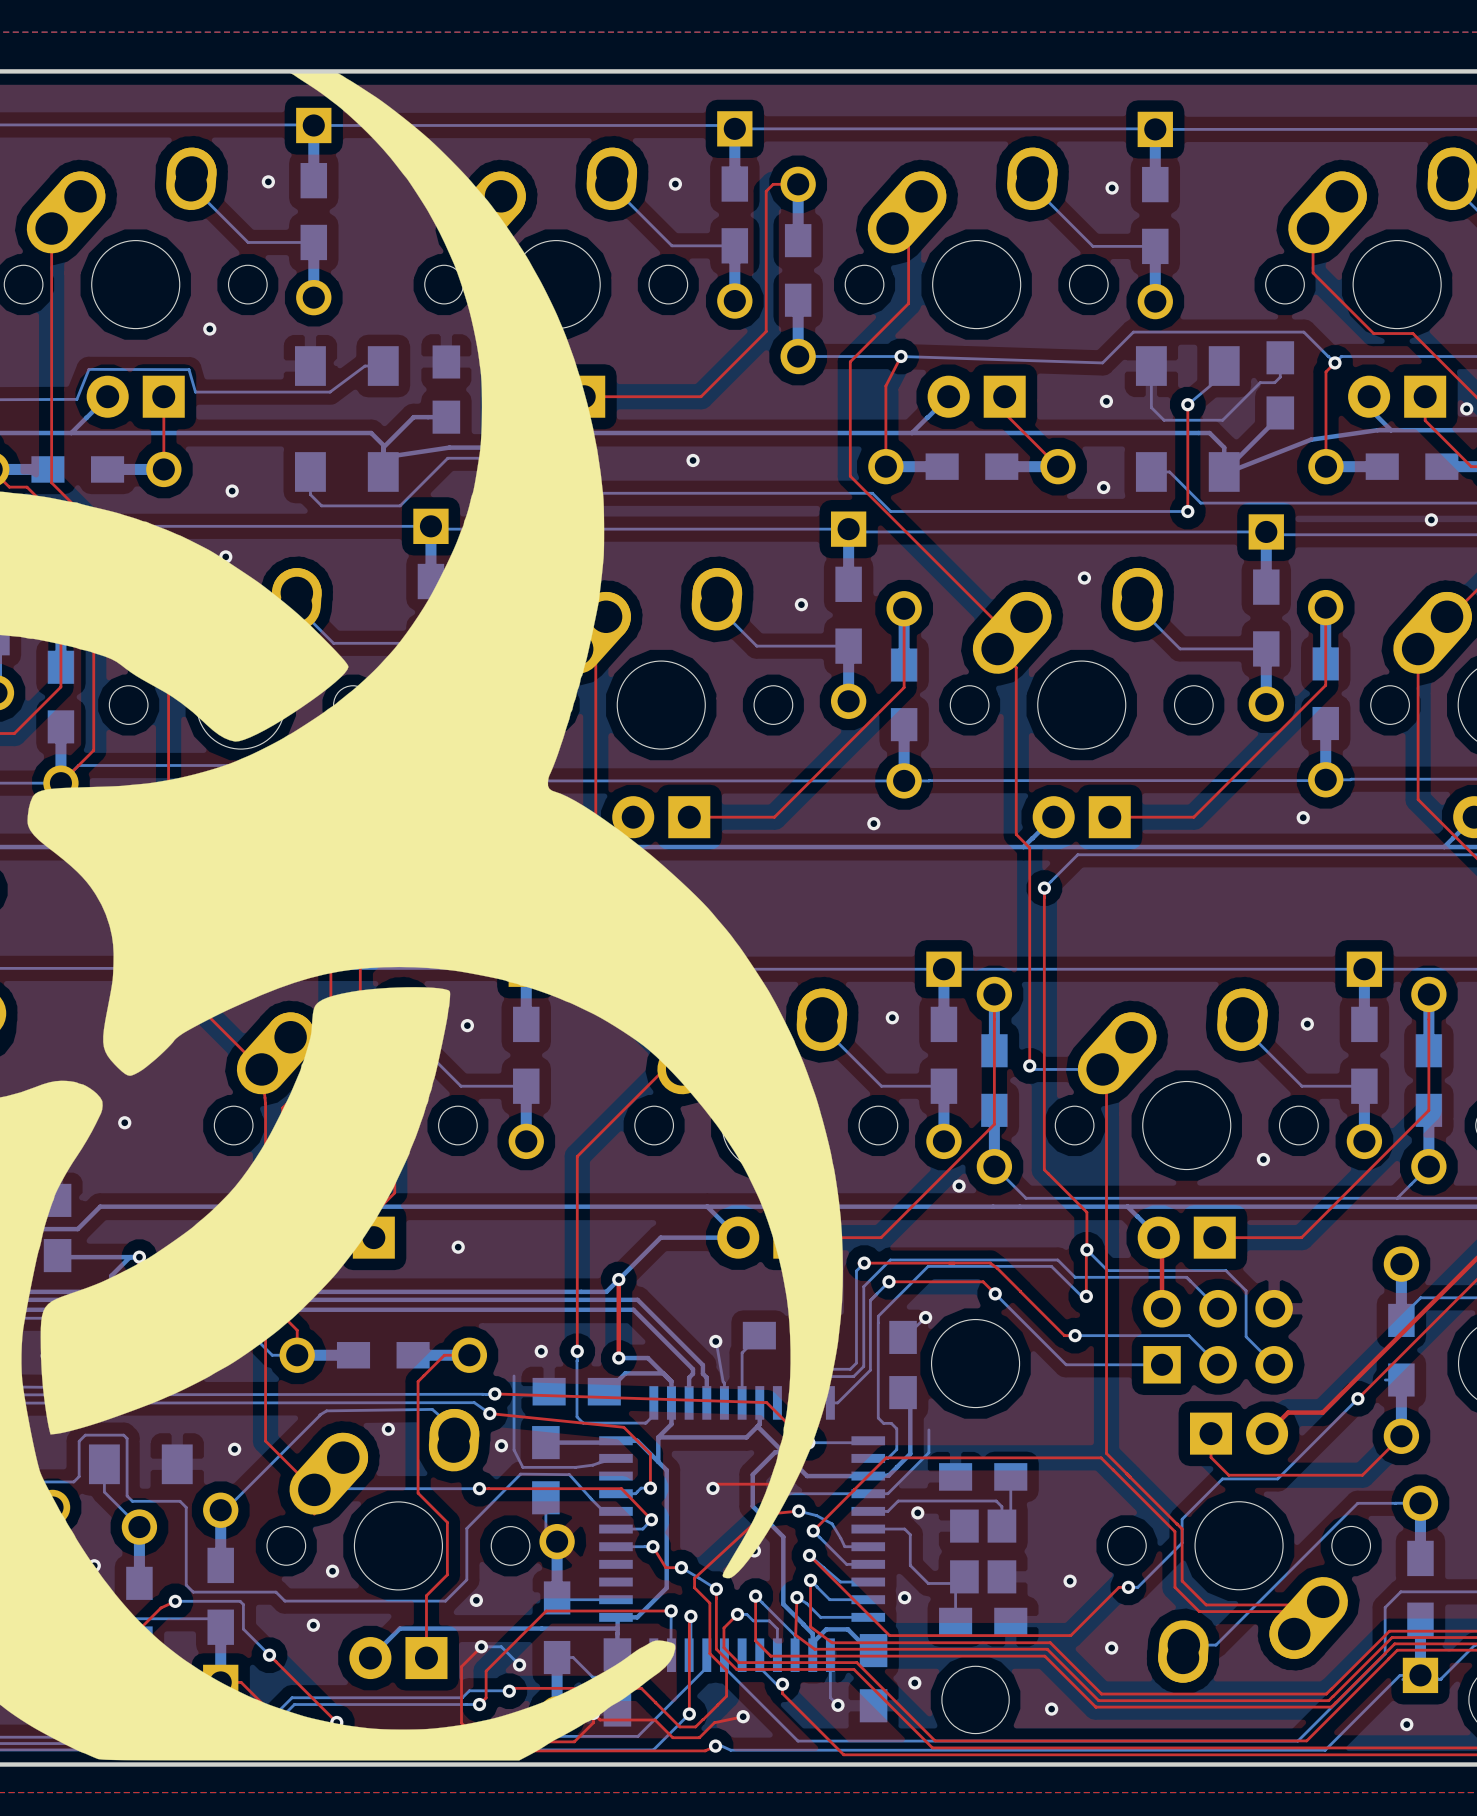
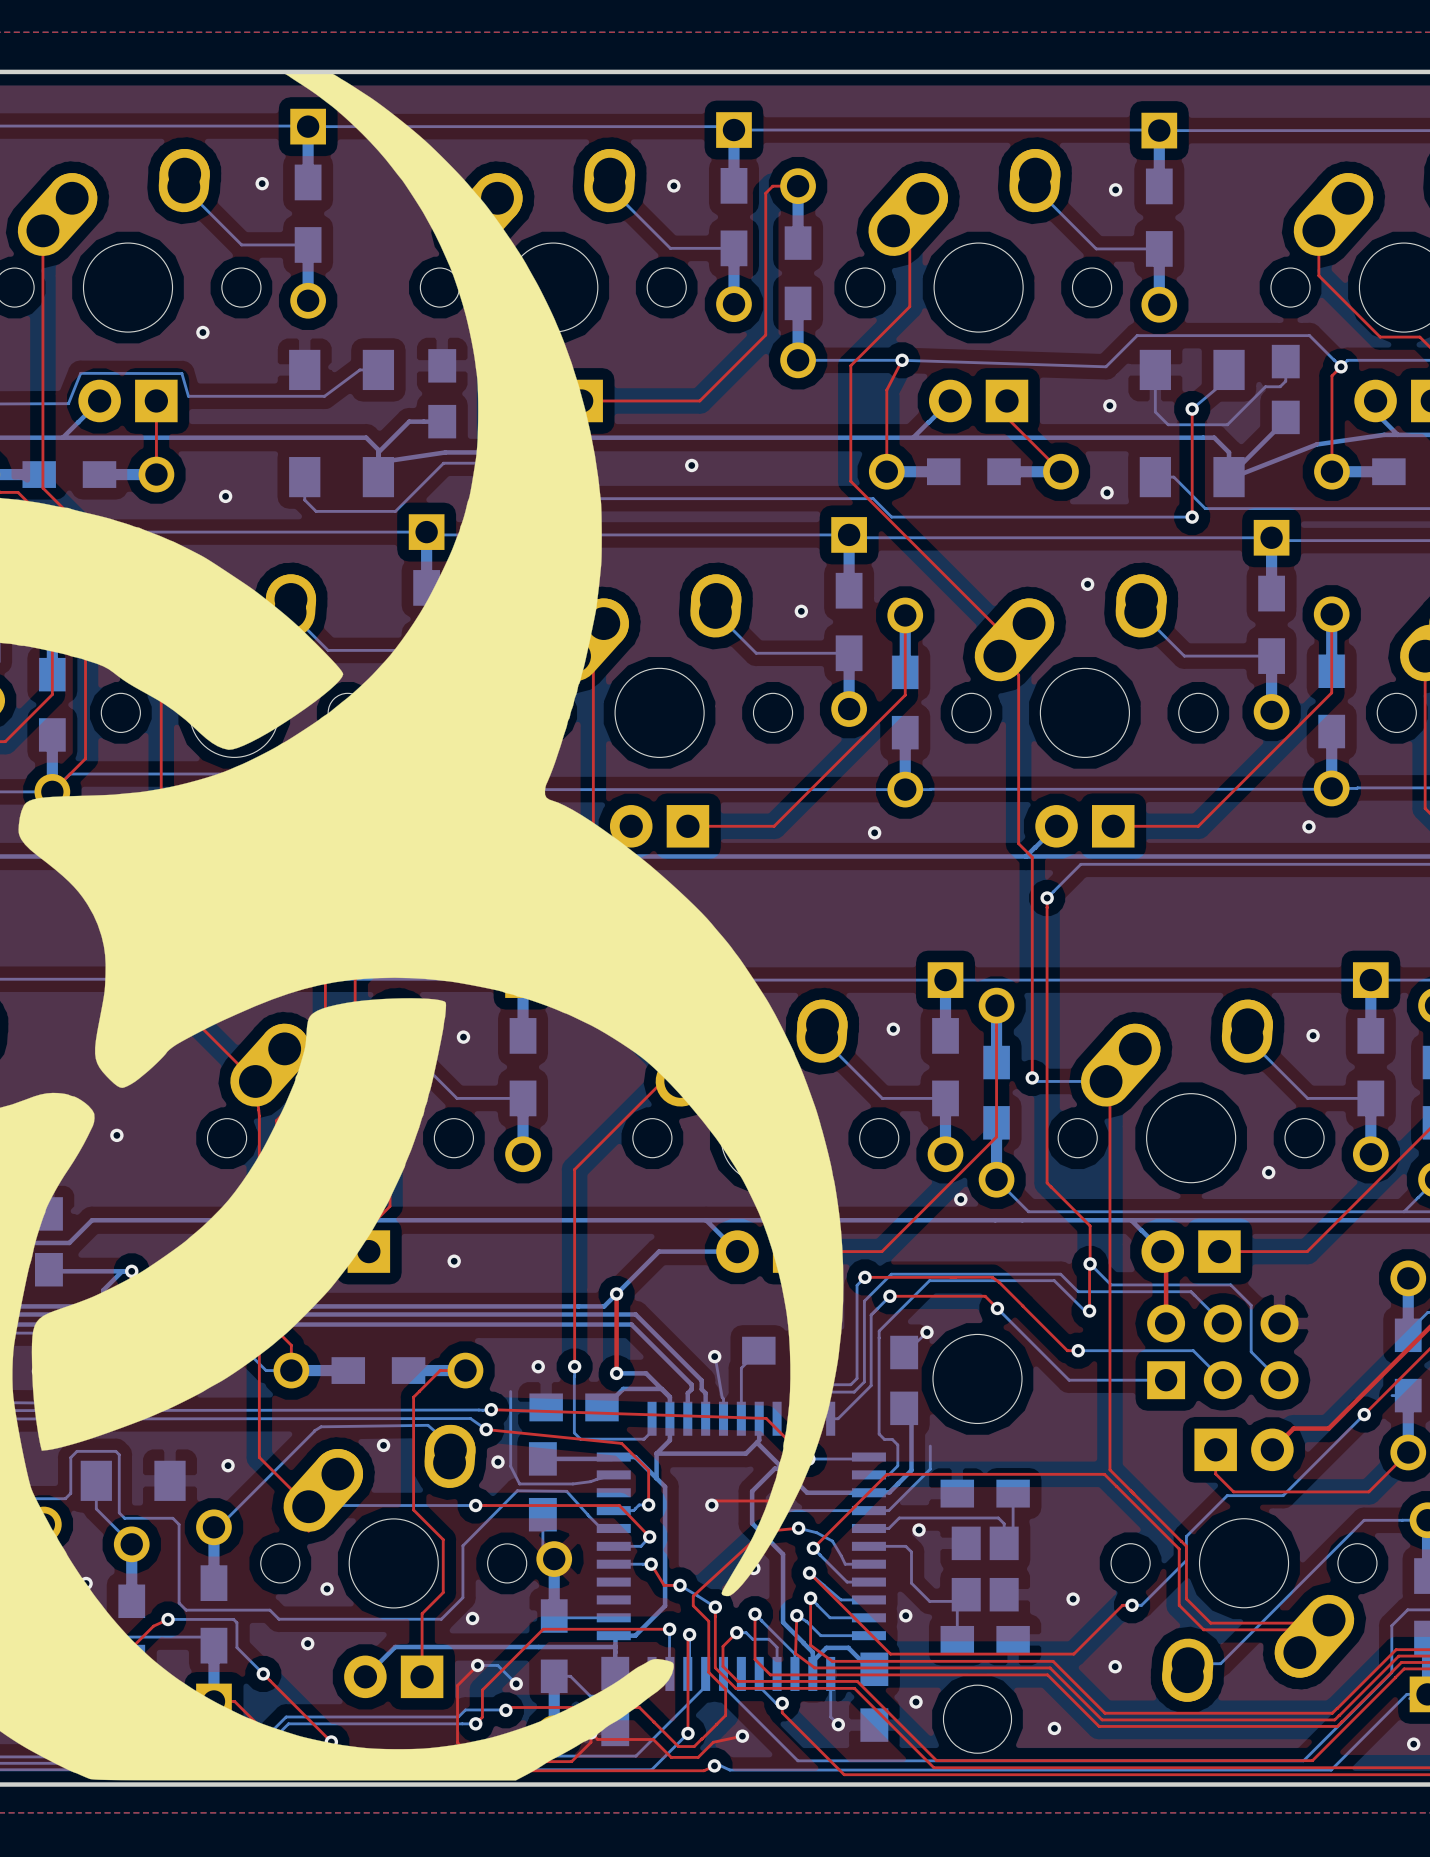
via: (225, 556) -> none

